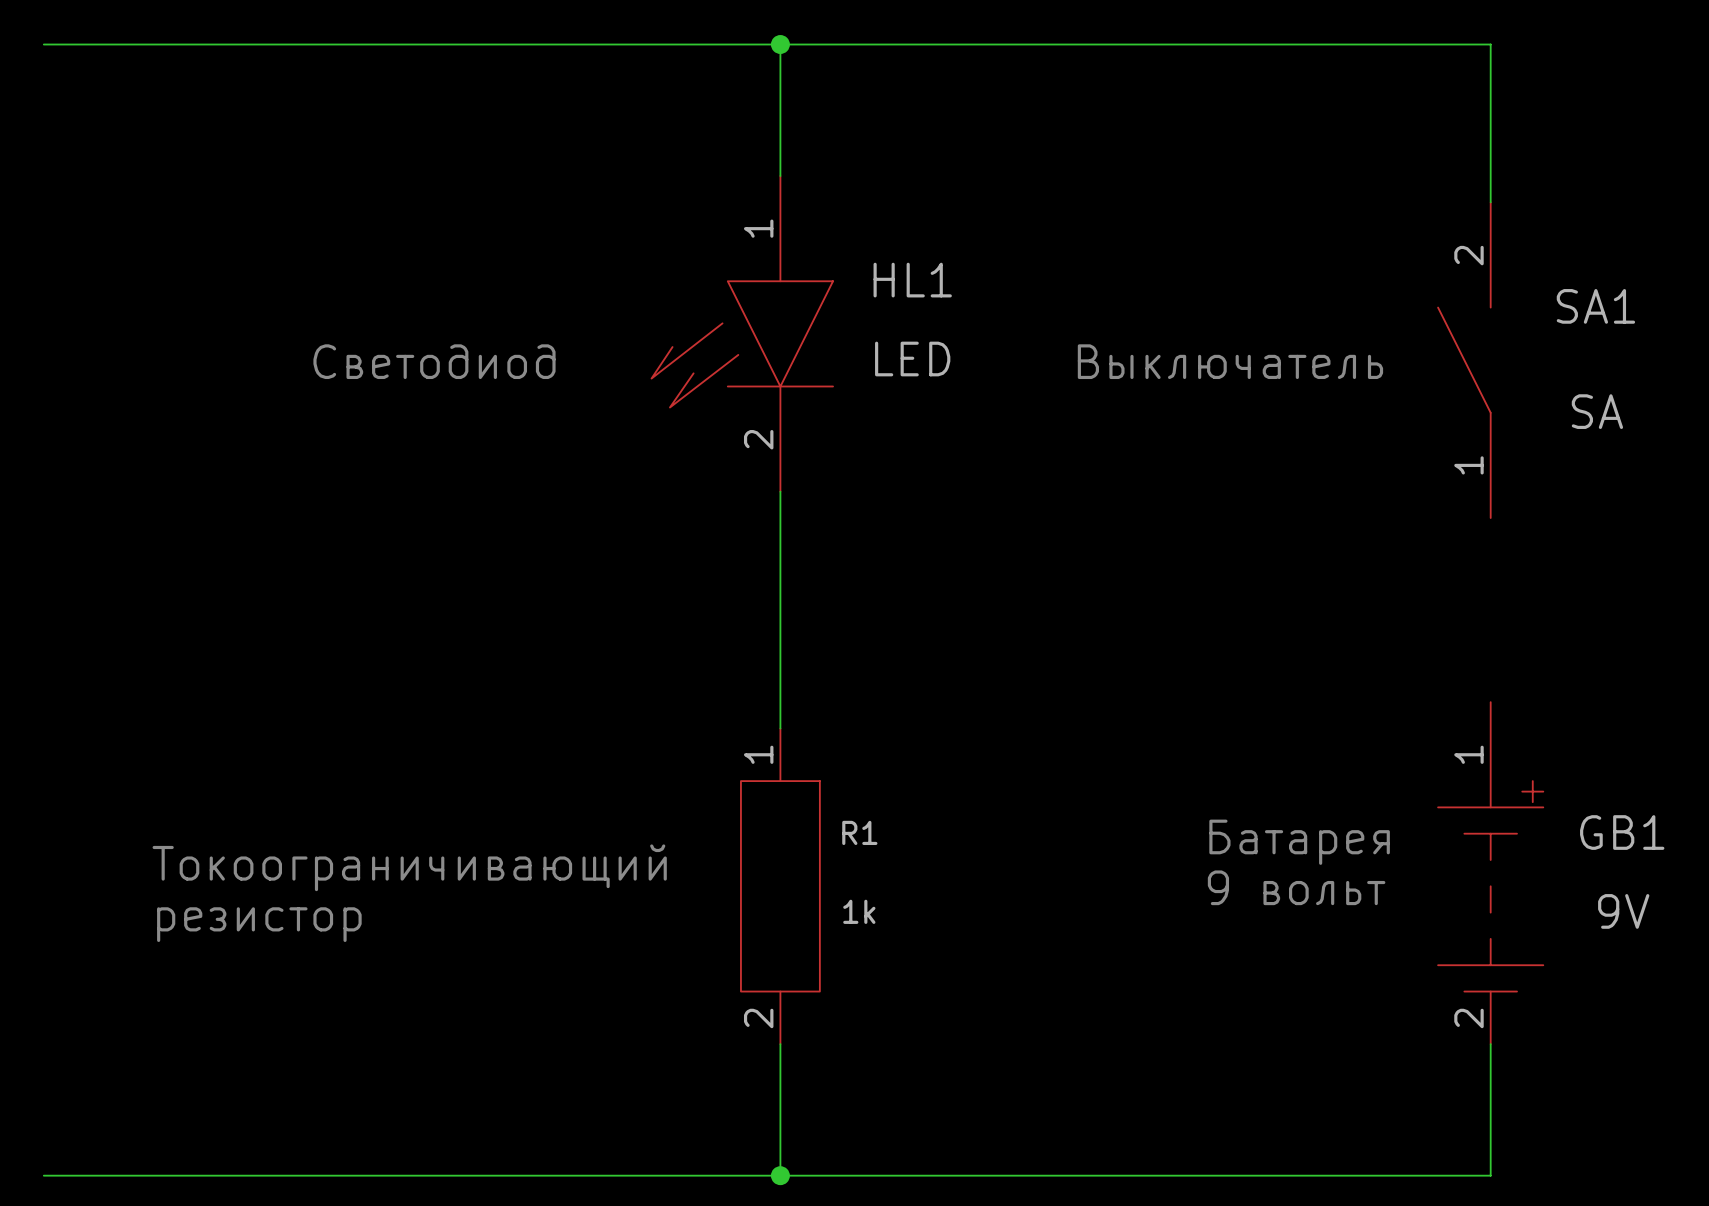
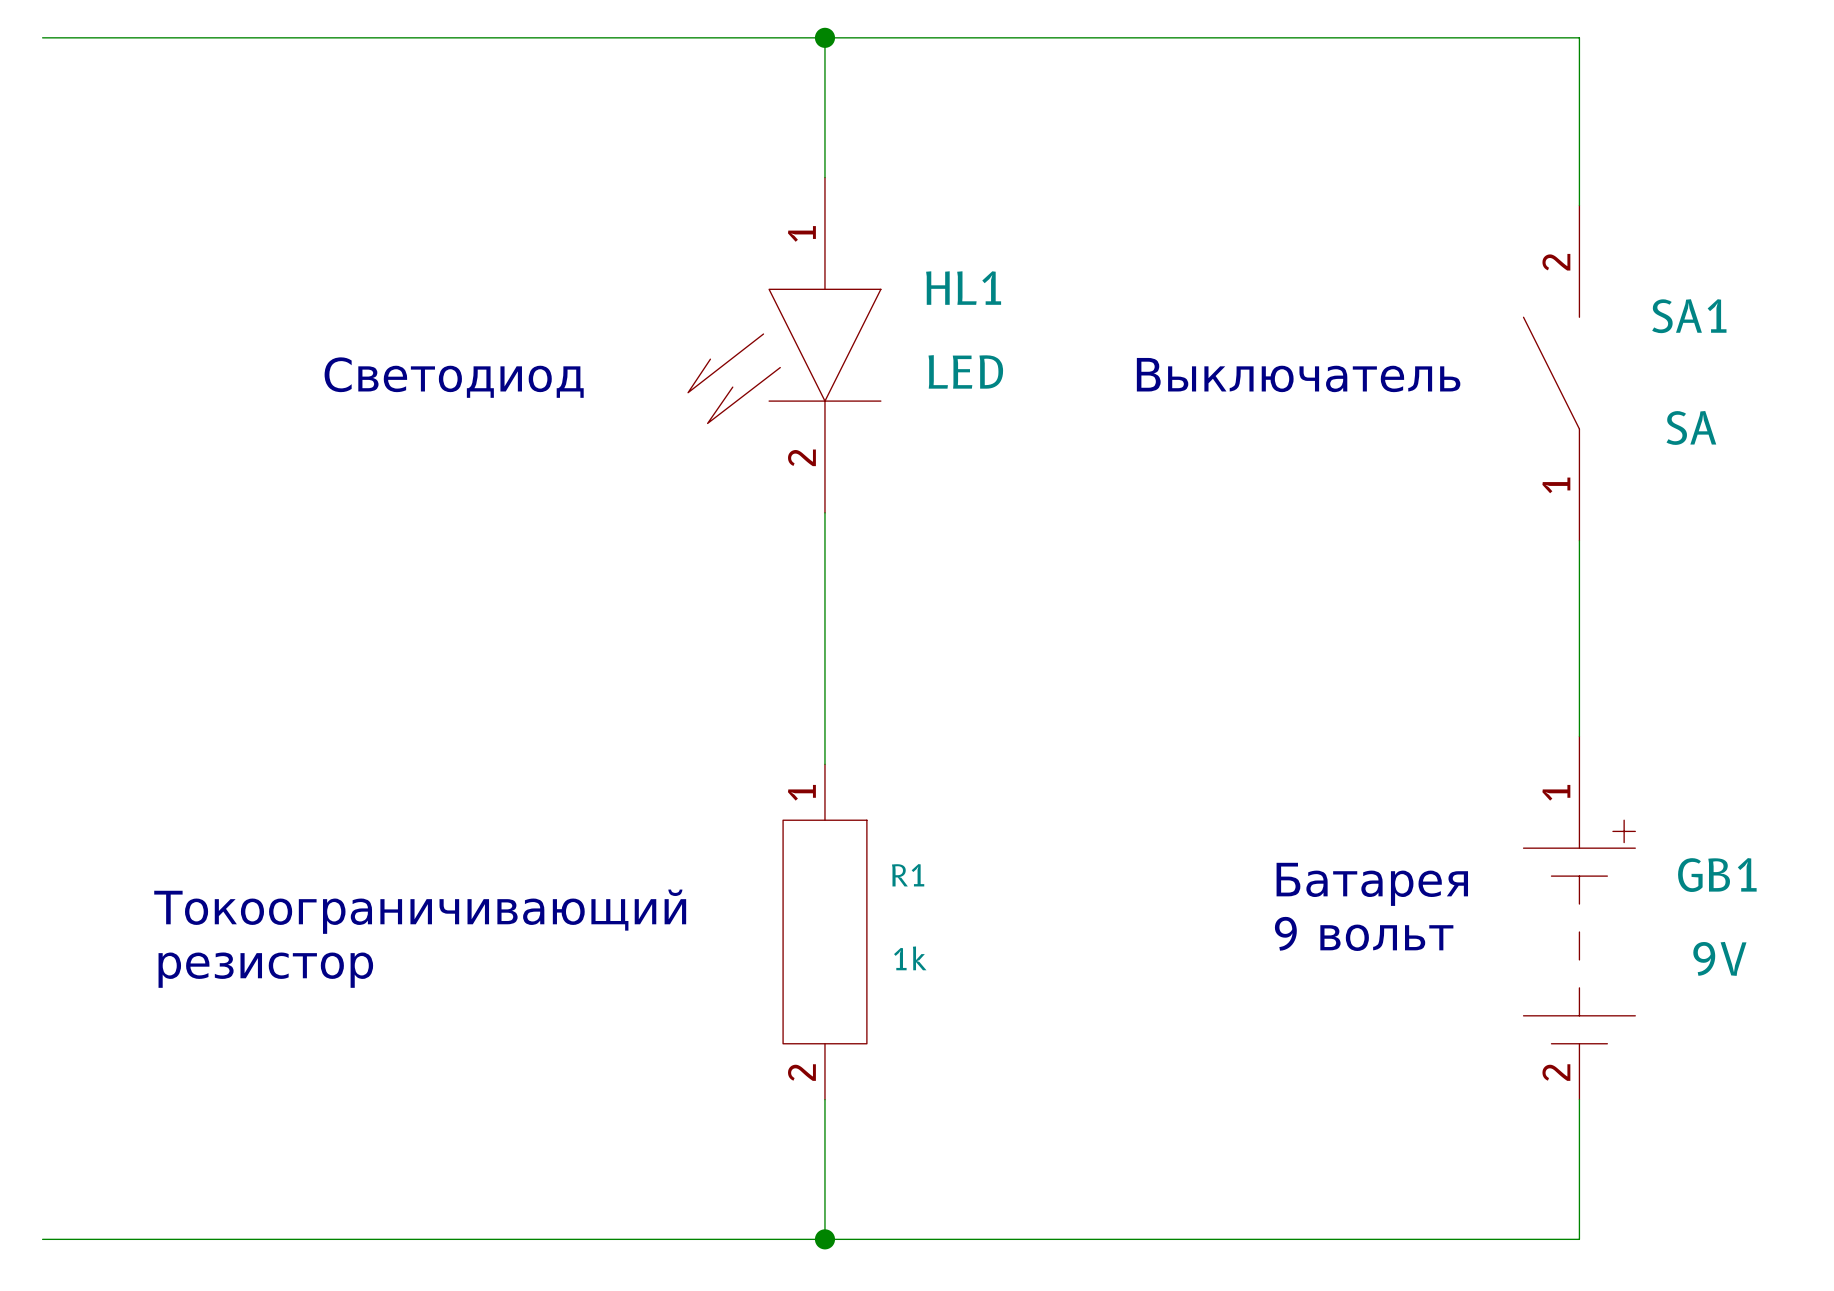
wire: none -> (1579, 540) (1579, 736)

